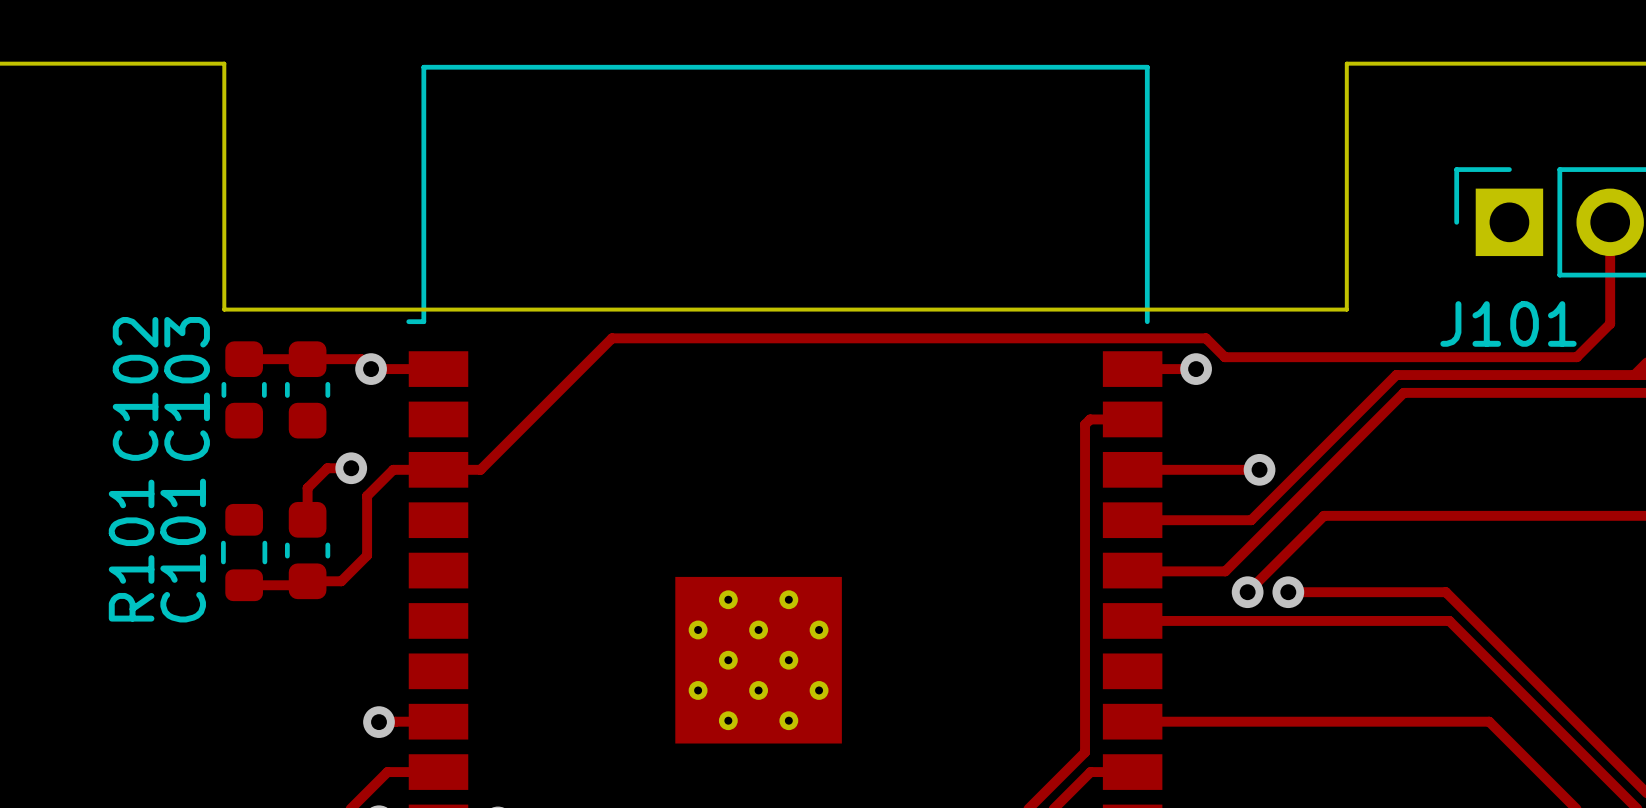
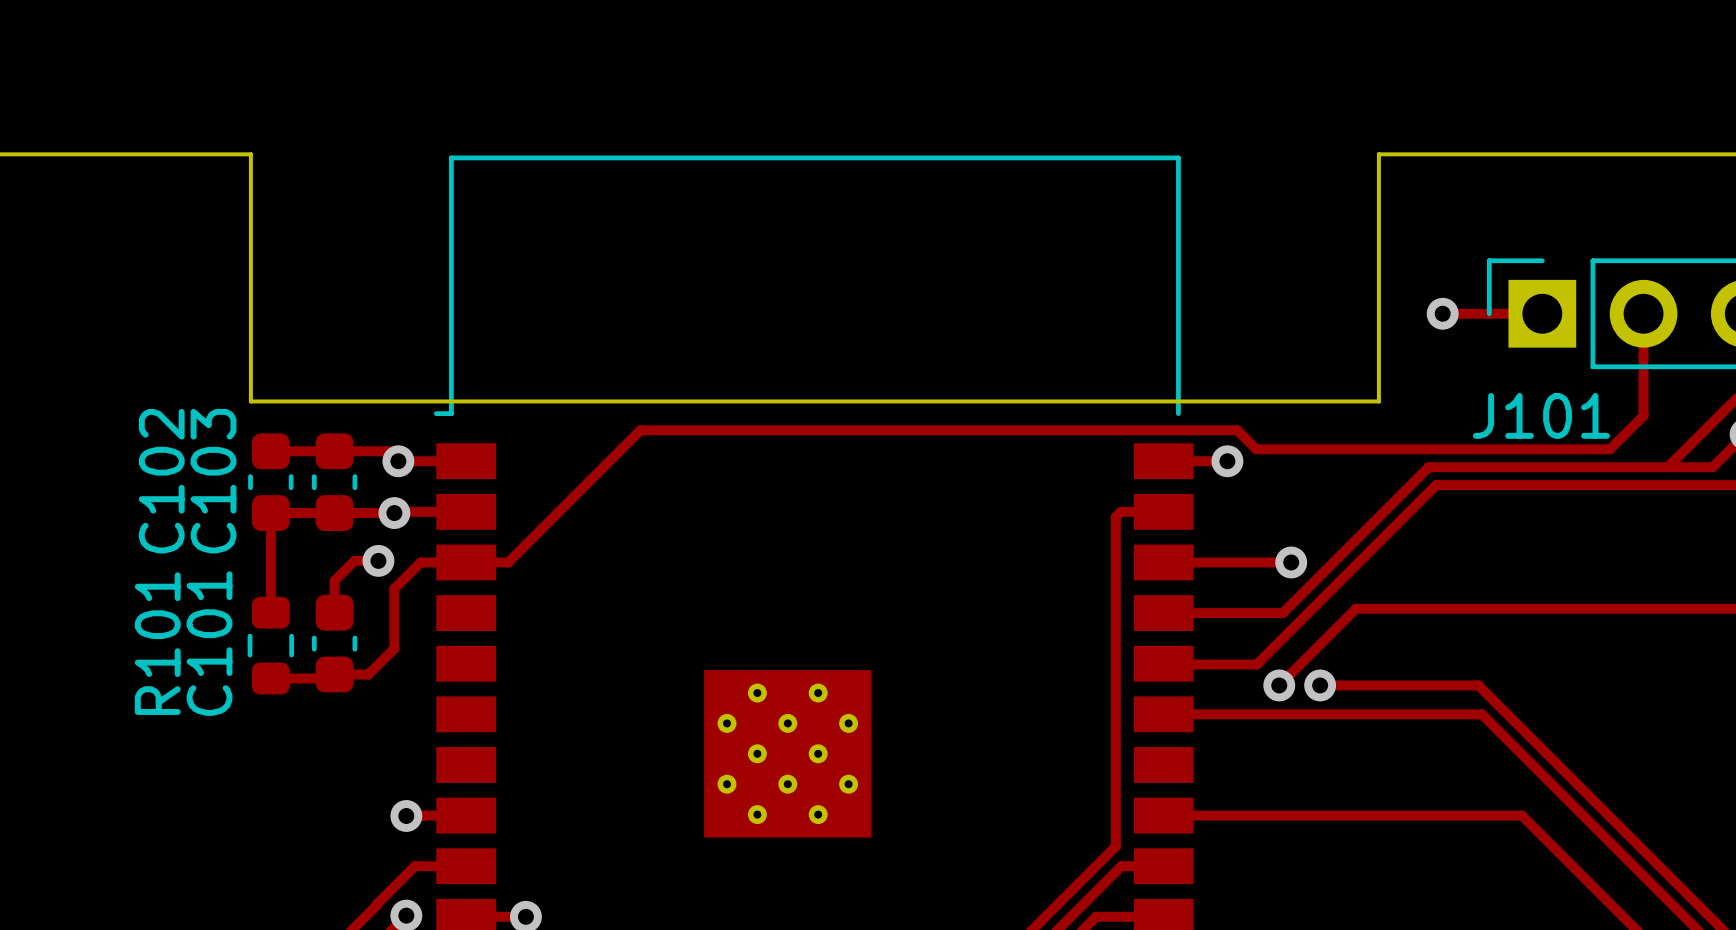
track: none -> (1442, 313) (1542, 313)
via: none -> (1442, 313)
track: none -> (466, 511) (270, 513) (270, 612)
via: none -> (394, 513)

